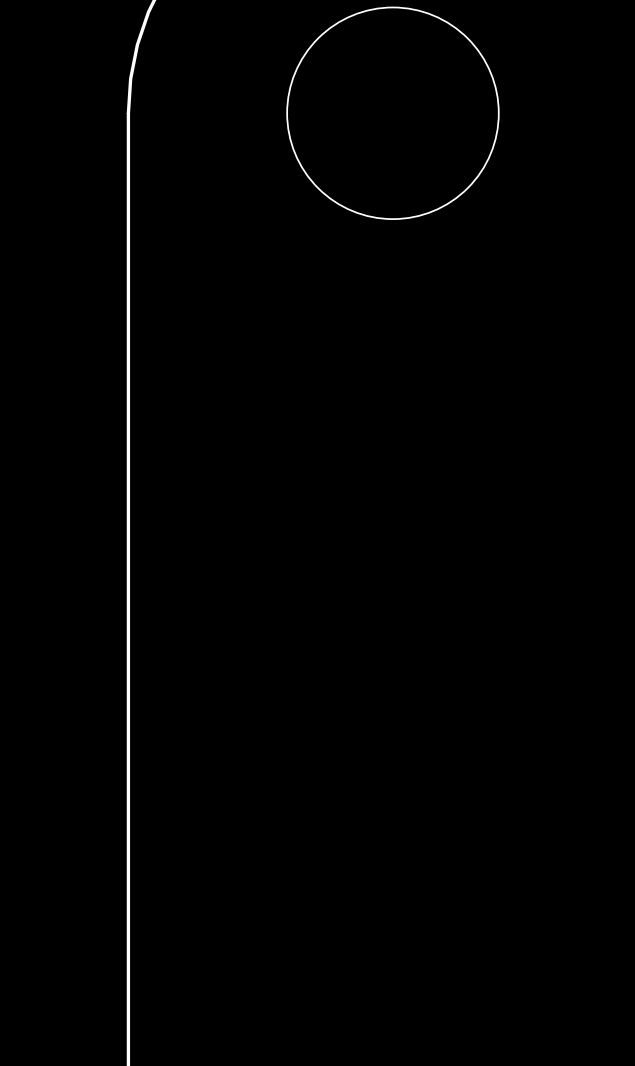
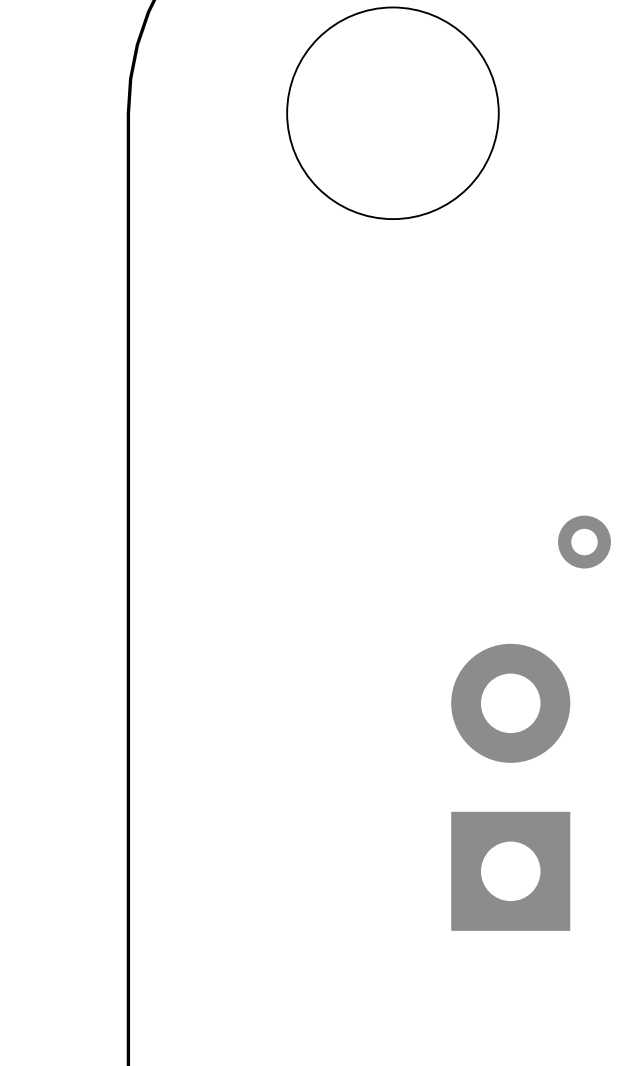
via: none -> (584, 542)
part: none -> (510, 787)

